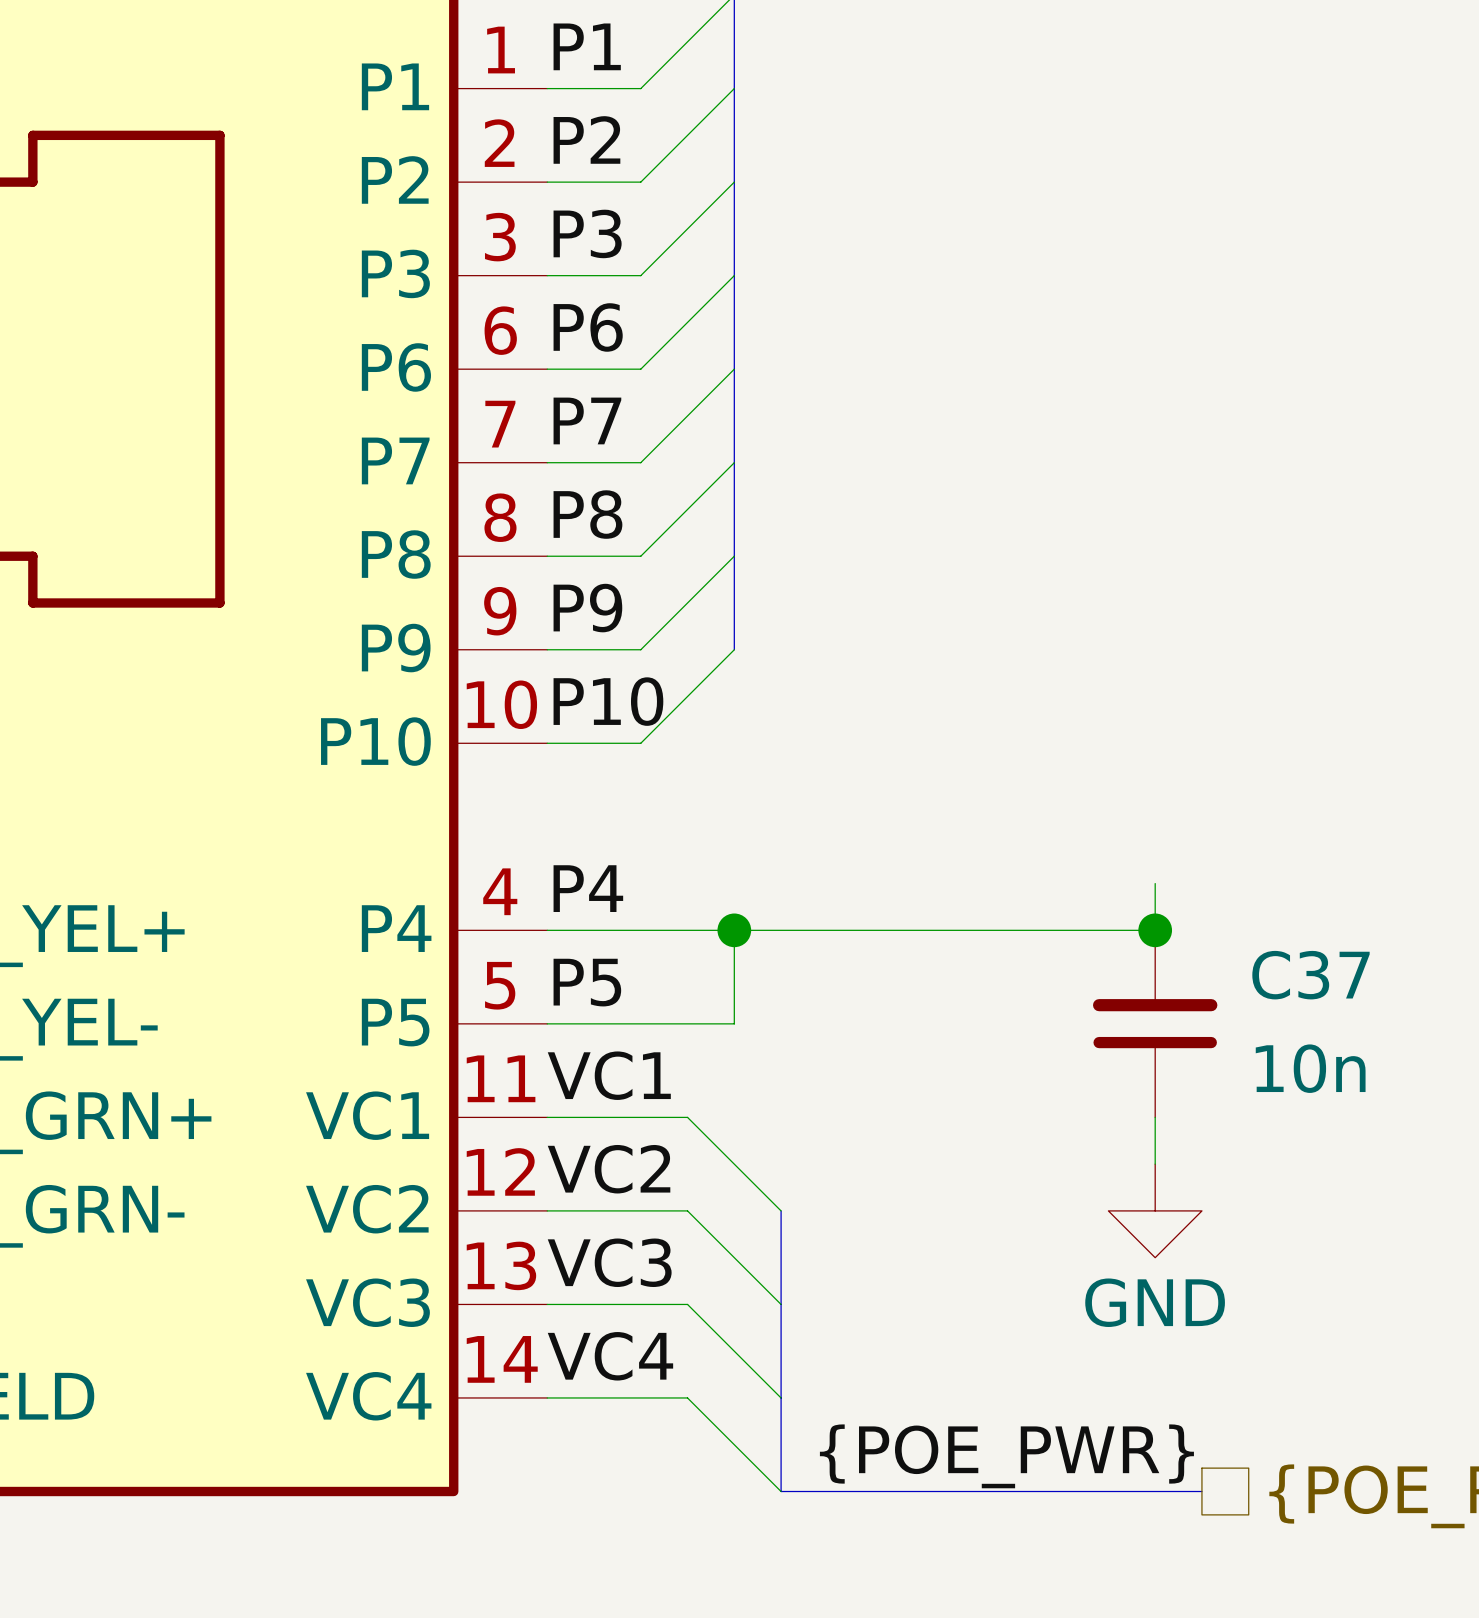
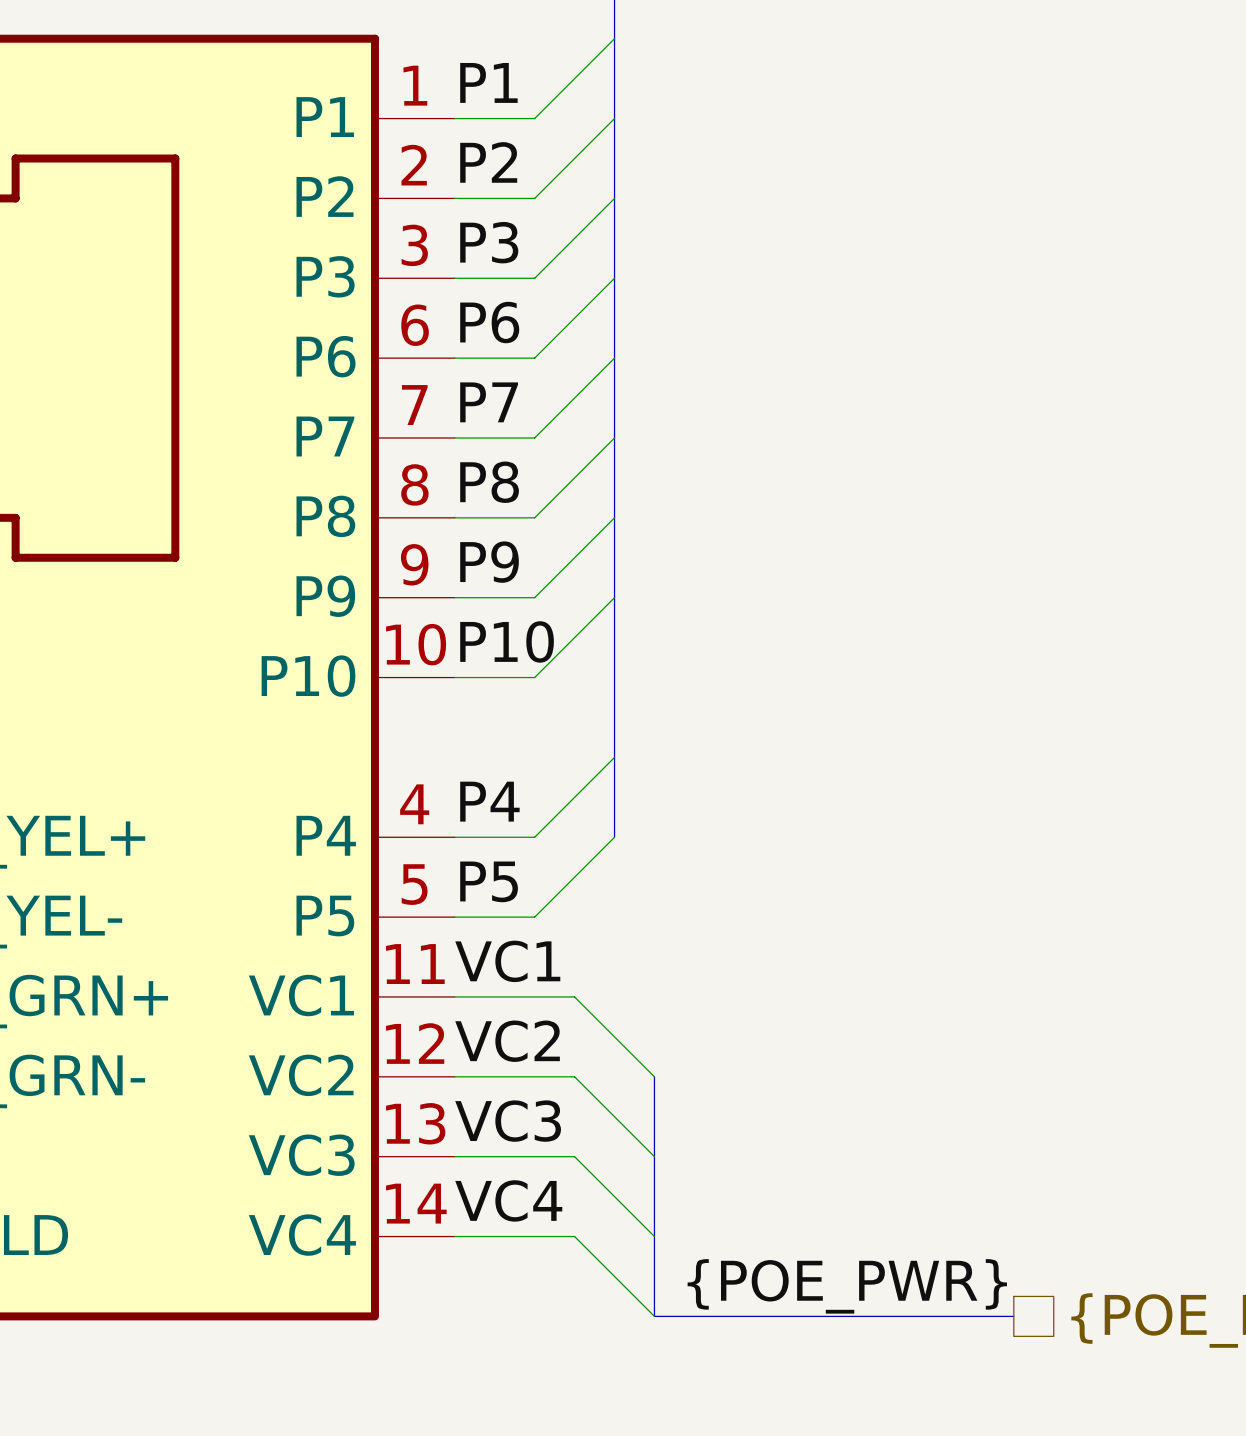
bus: none -> (614, 597) (614, 837)
wire: (1155, 883) (1155, 930) (640, 930) -> (614, 757) (534, 837)
wire: (734, 930) (734, 1023) (640, 1023) -> (614, 837) (534, 917)
junction: (734, 930) -> none
junction: (1155, 930) -> none
C37: (1155, 1023) -> none
wire: (1155, 1117) (1155, 1164) -> none
power symbol: GND (1155, 1210) -> none

